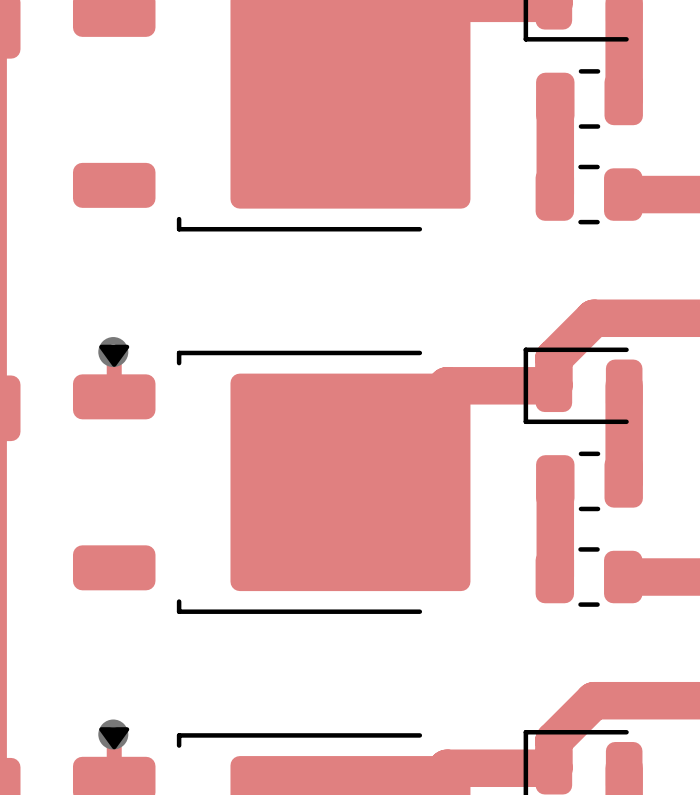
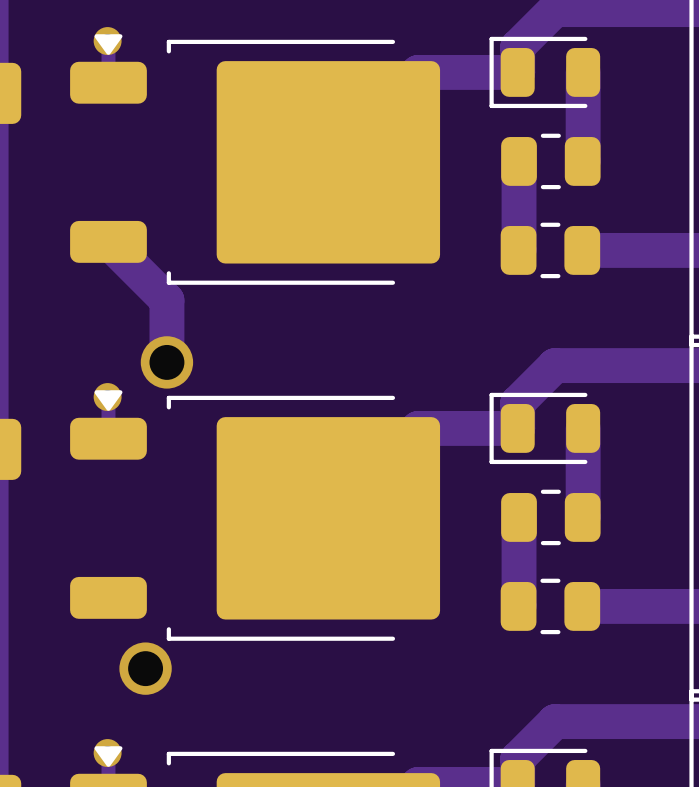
track: none -> (108, 241) (166, 300) (166, 362)
via: none -> (166, 362)
via: none -> (145, 668)

